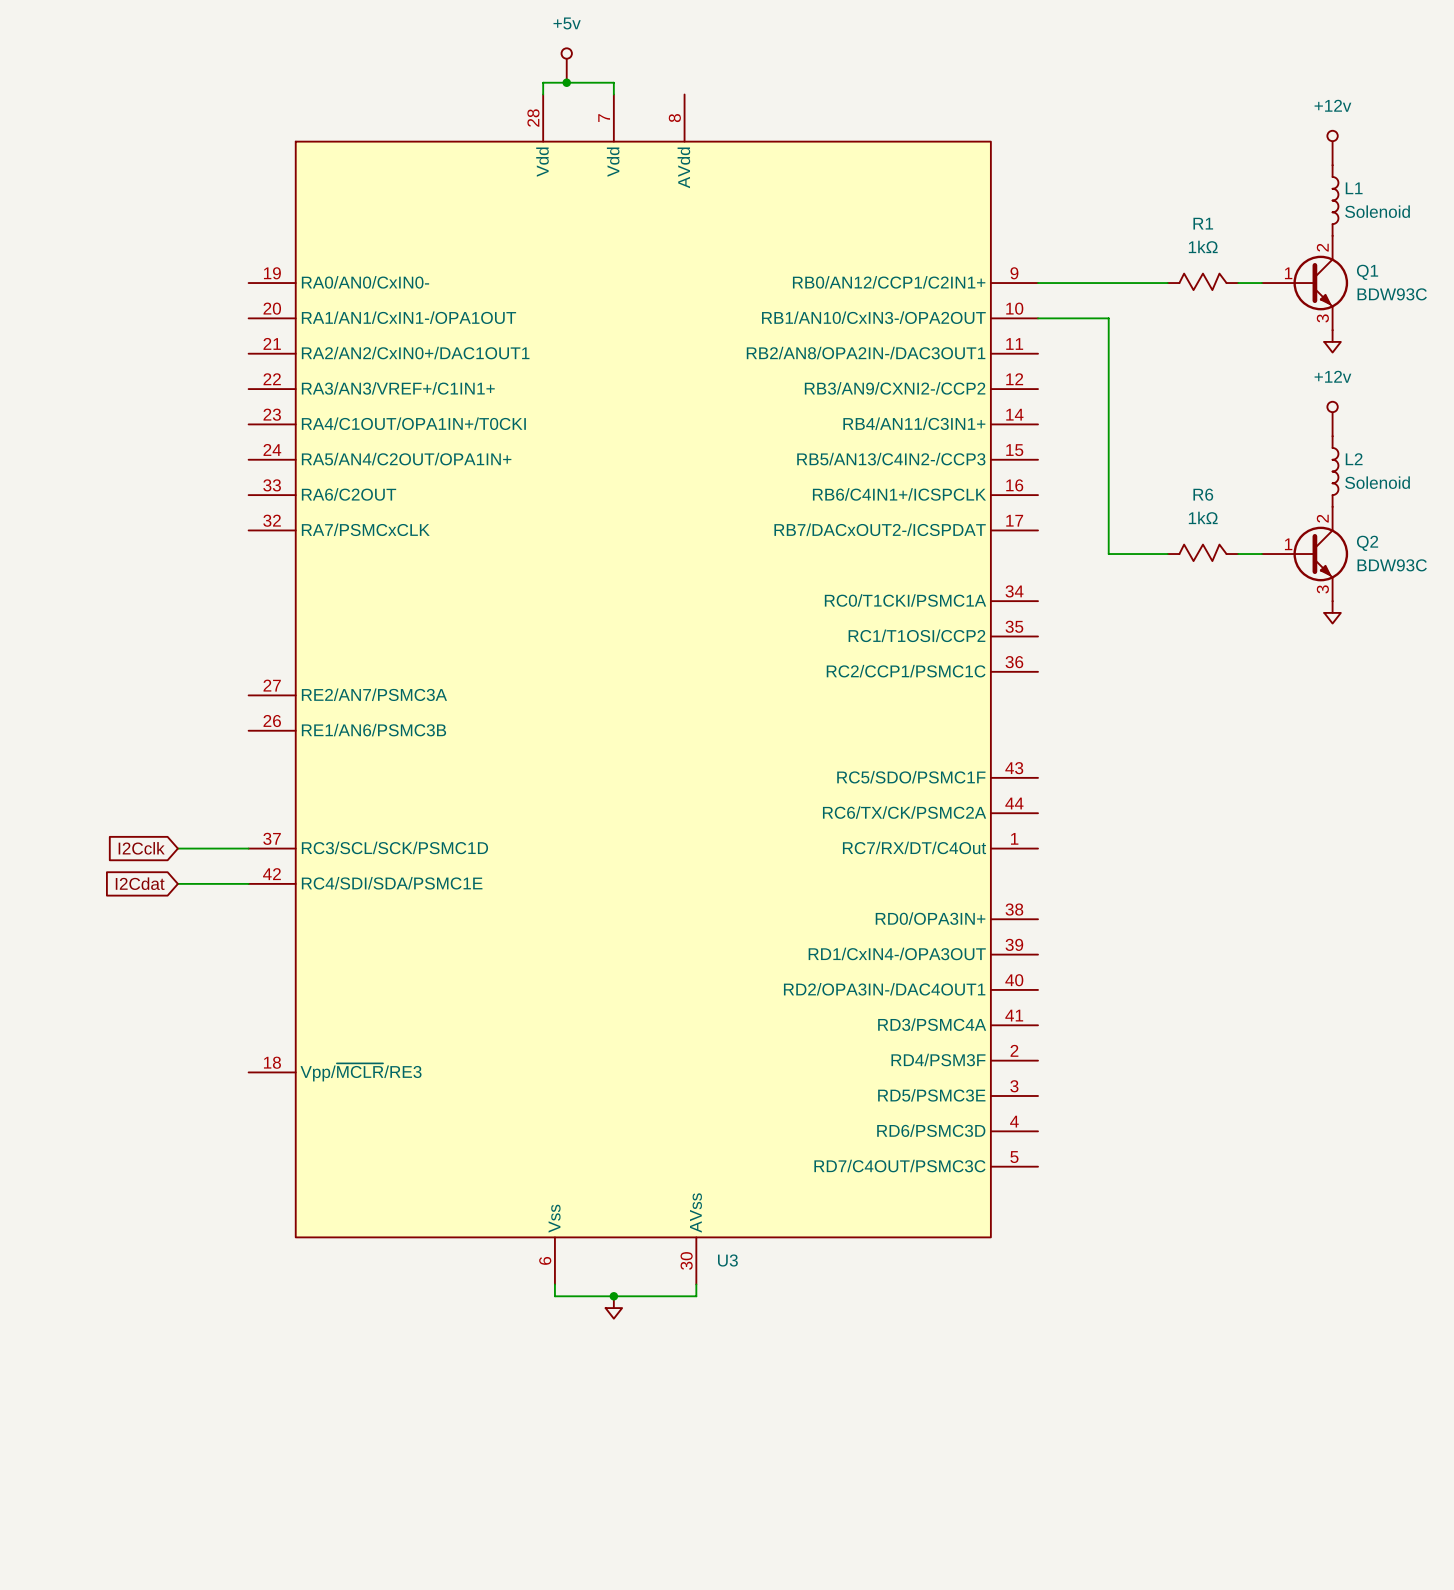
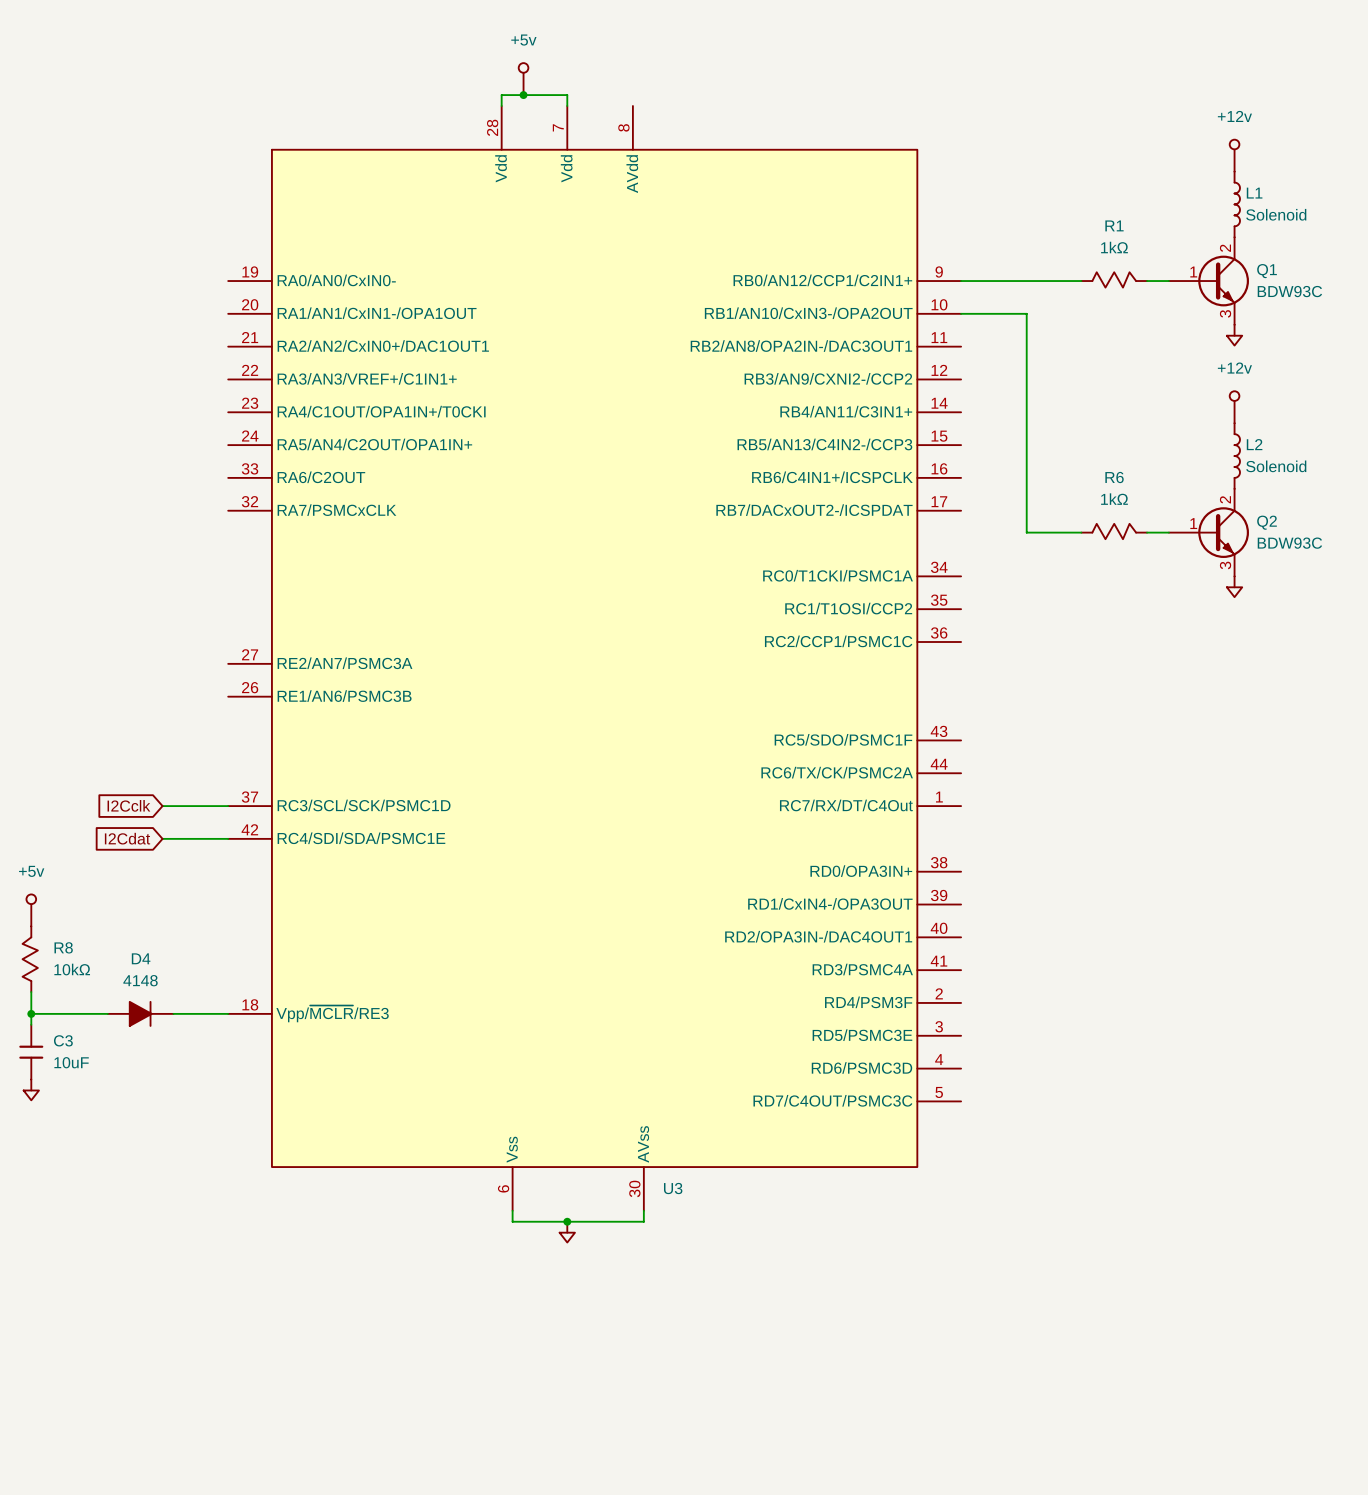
power symbol: none -> +5v (31, 910)
R8: none -> 10kΩ (30, 959)
wire: none -> (31, 992) (31, 1024)
wire: none -> (31, 1013) (107, 1013)
junction: none -> (31, 1013)
D4: none -> 4148 (140, 1013)
wire: none -> (173, 1013) (228, 1013)
C3: none -> 10uF (31, 1052)
power symbol: none -> (31, 1089)

